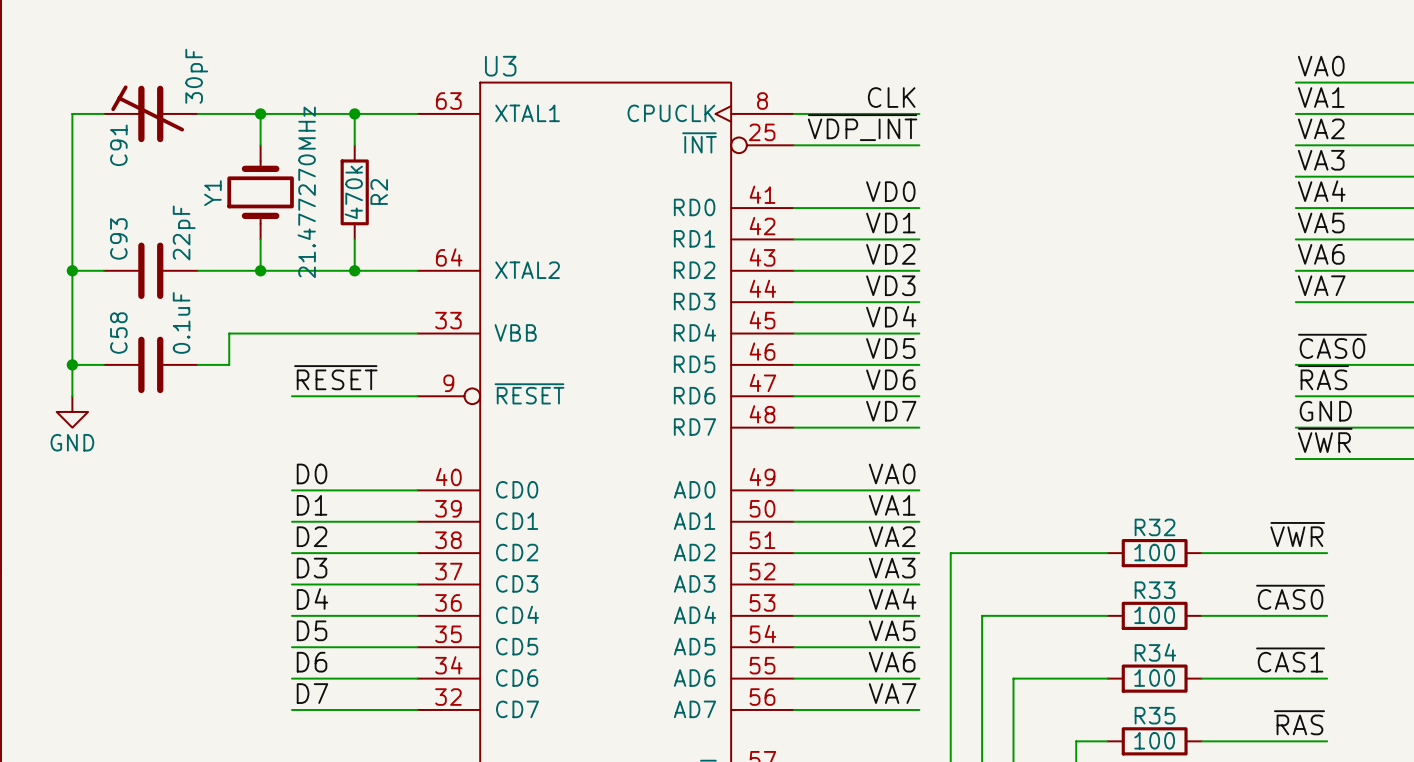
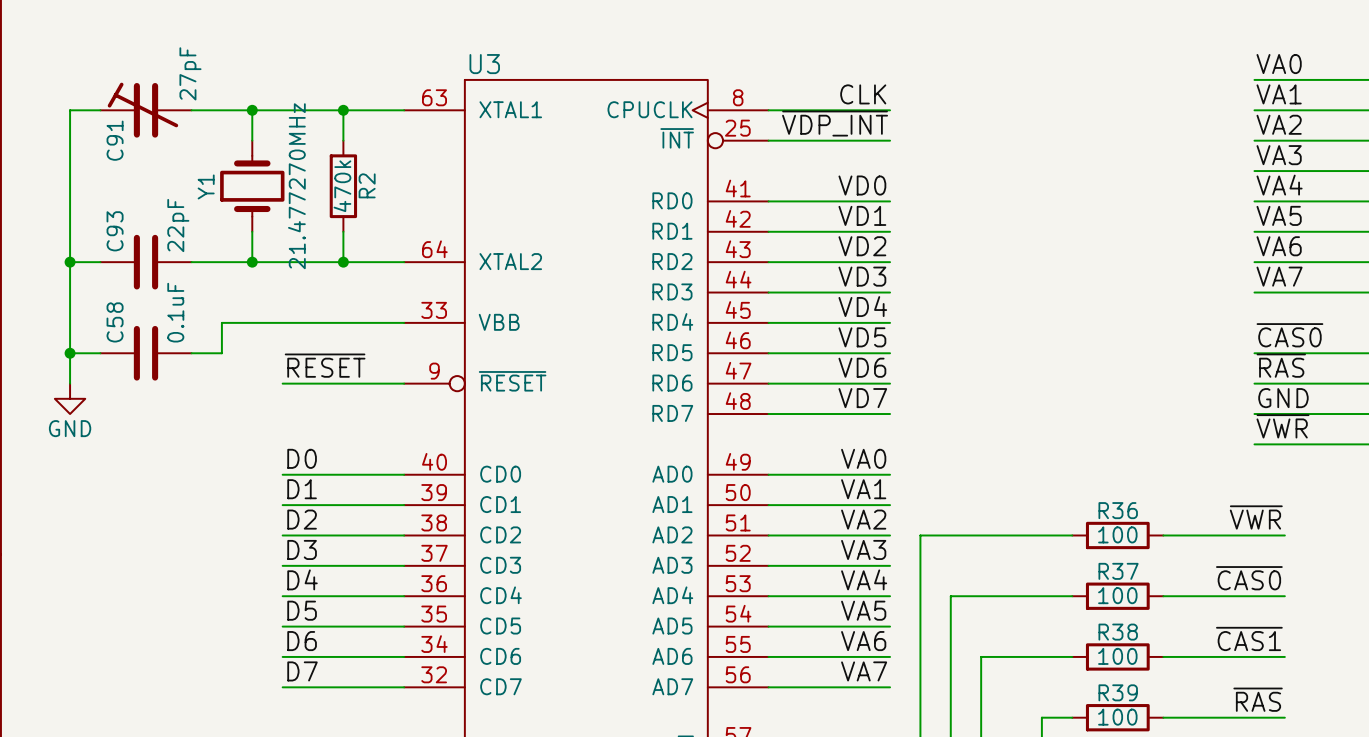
C91 value: 30pF (196, 76) -> 27pF (190, 73)
R32 name: R32 (1155, 527) -> R36 (1118, 510)
R33 name: R33 (1155, 590) -> R37 (1118, 571)
R34 name: R34 (1155, 652) -> R38 (1118, 632)
R35 name: R35 (1155, 715) -> R39 (1118, 692)

